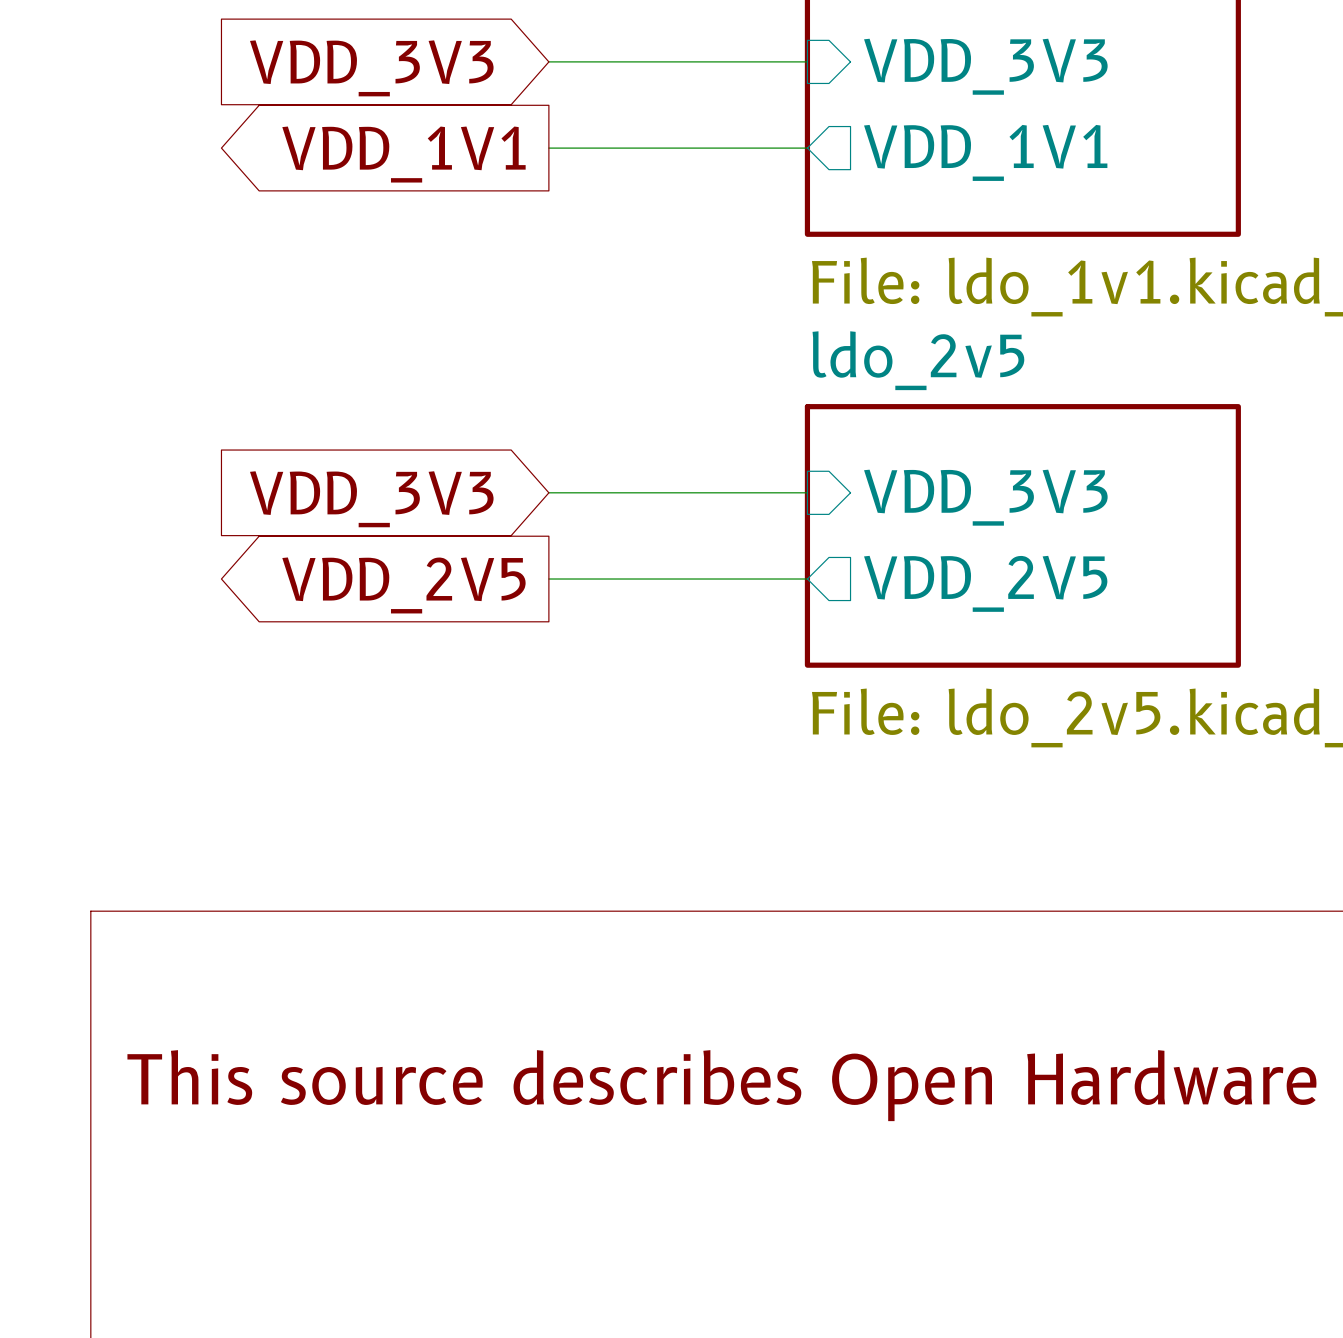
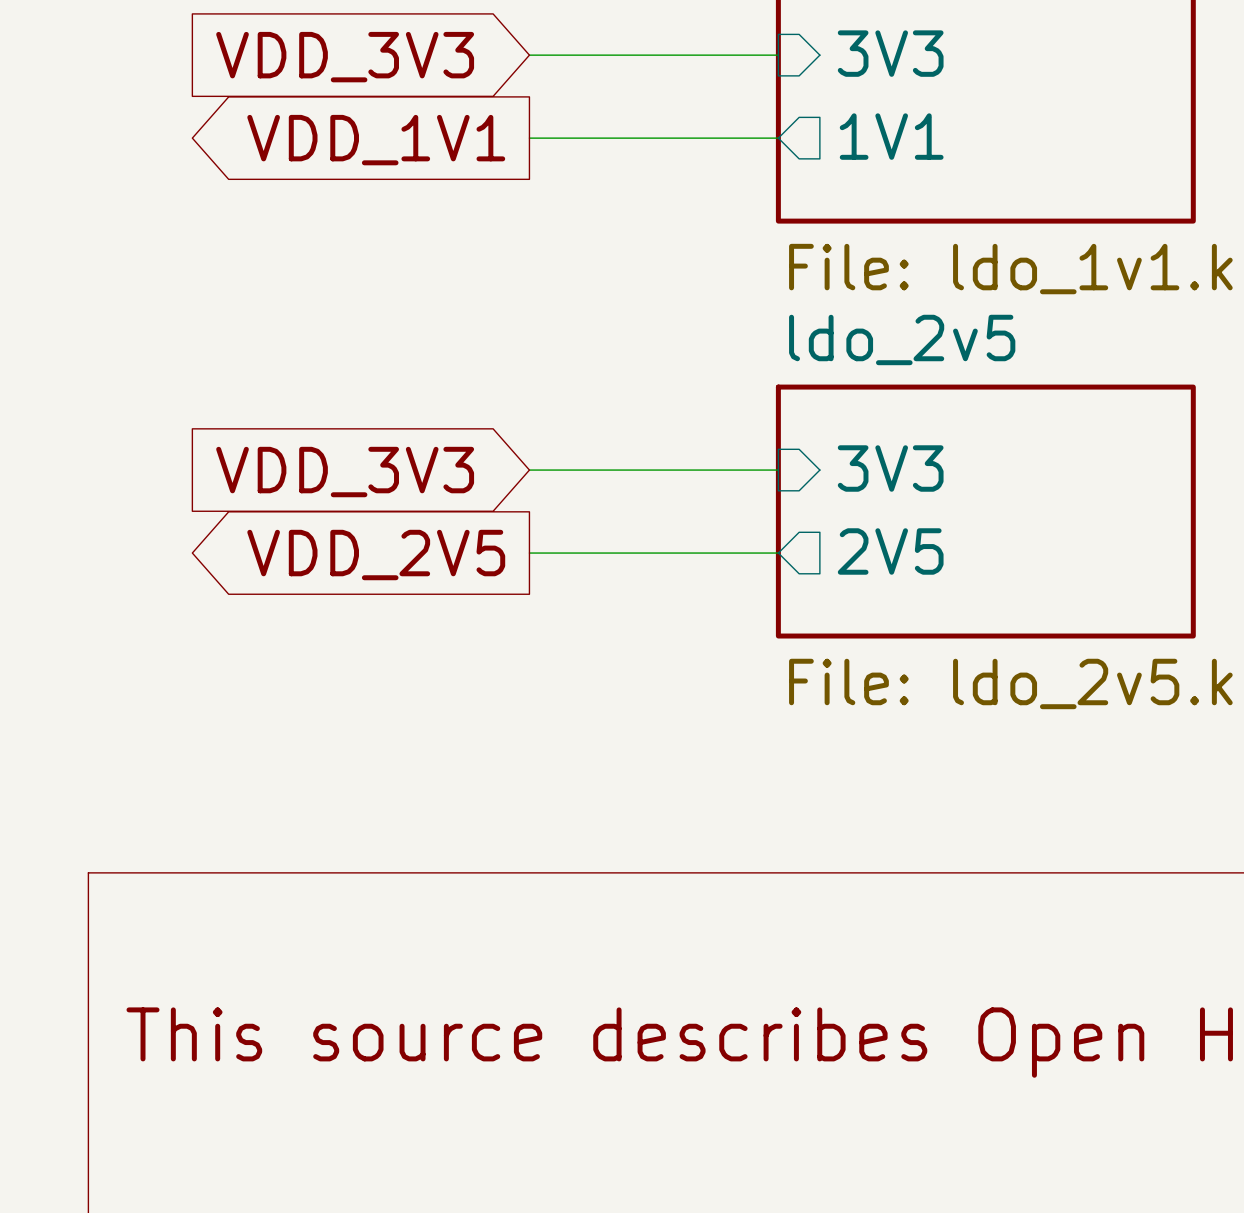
sheet pin: VDD_3V3 (985, 66) -> 3V3 (890, 53)
sheet pin: VDD_1V1 (985, 152) -> 1V1 (891, 136)
sheet pin: VDD_3V3 (985, 497) -> 3V3 (890, 468)
sheet pin: VDD_2V5 (985, 583) -> 2V5 (890, 551)

